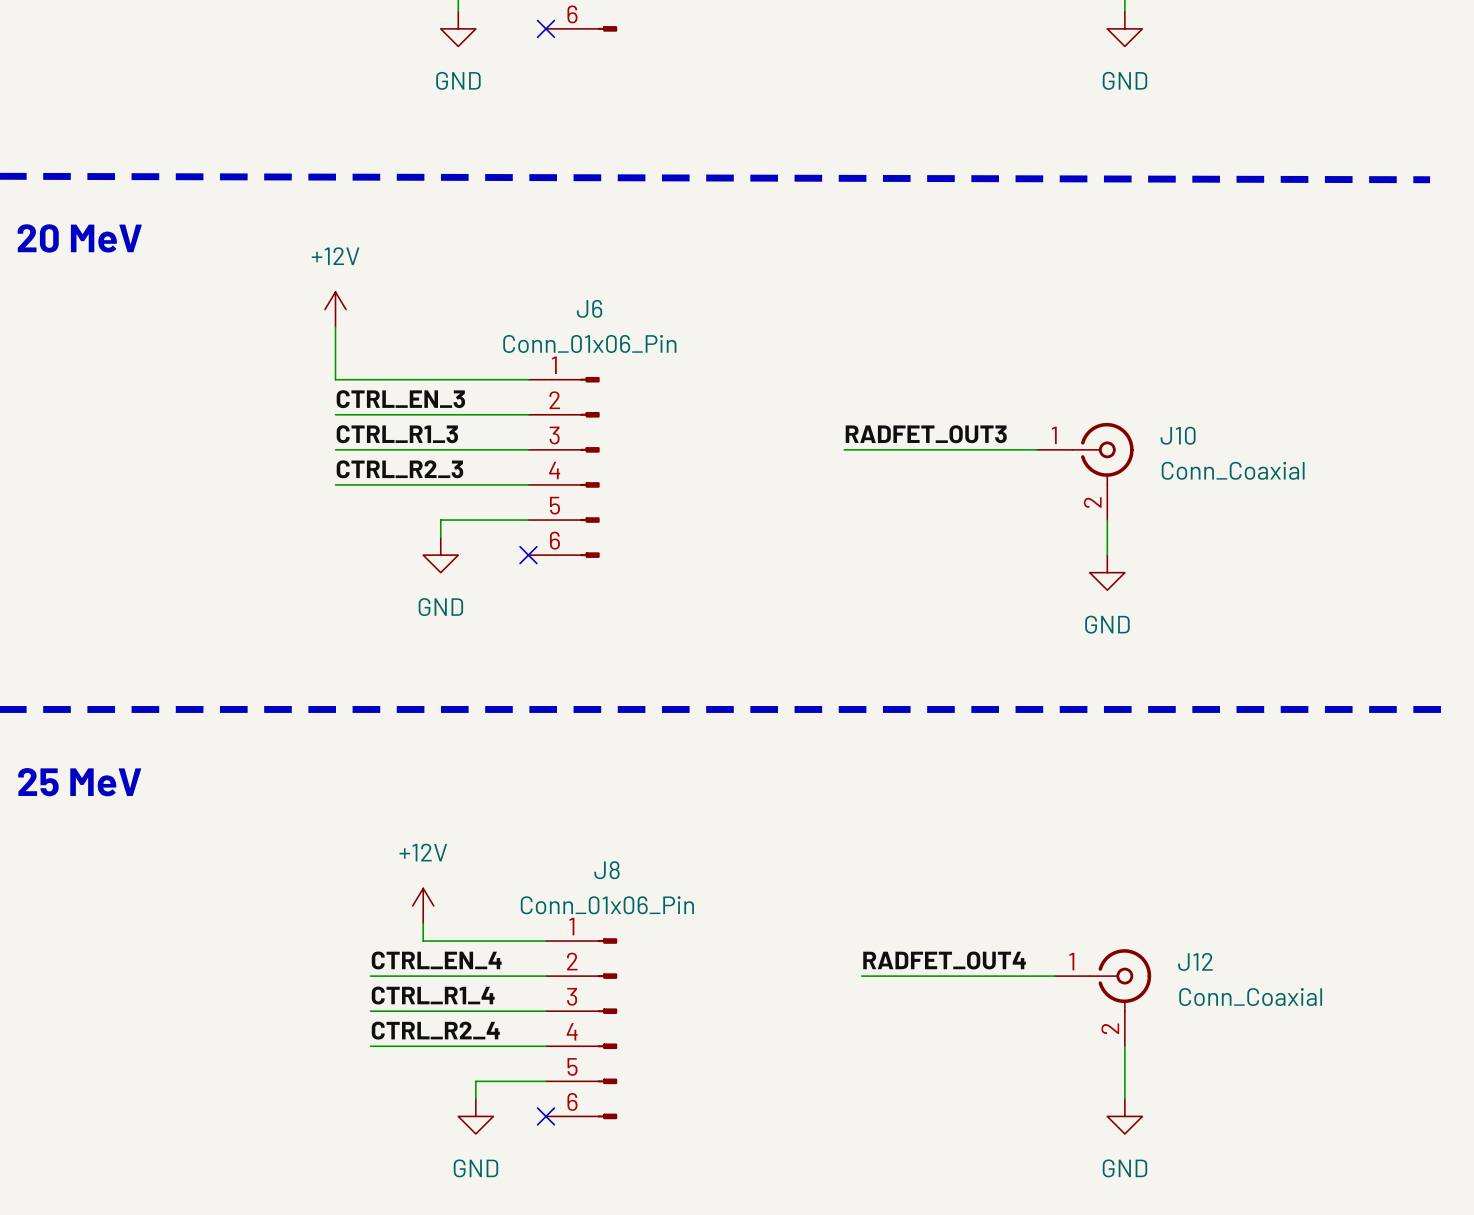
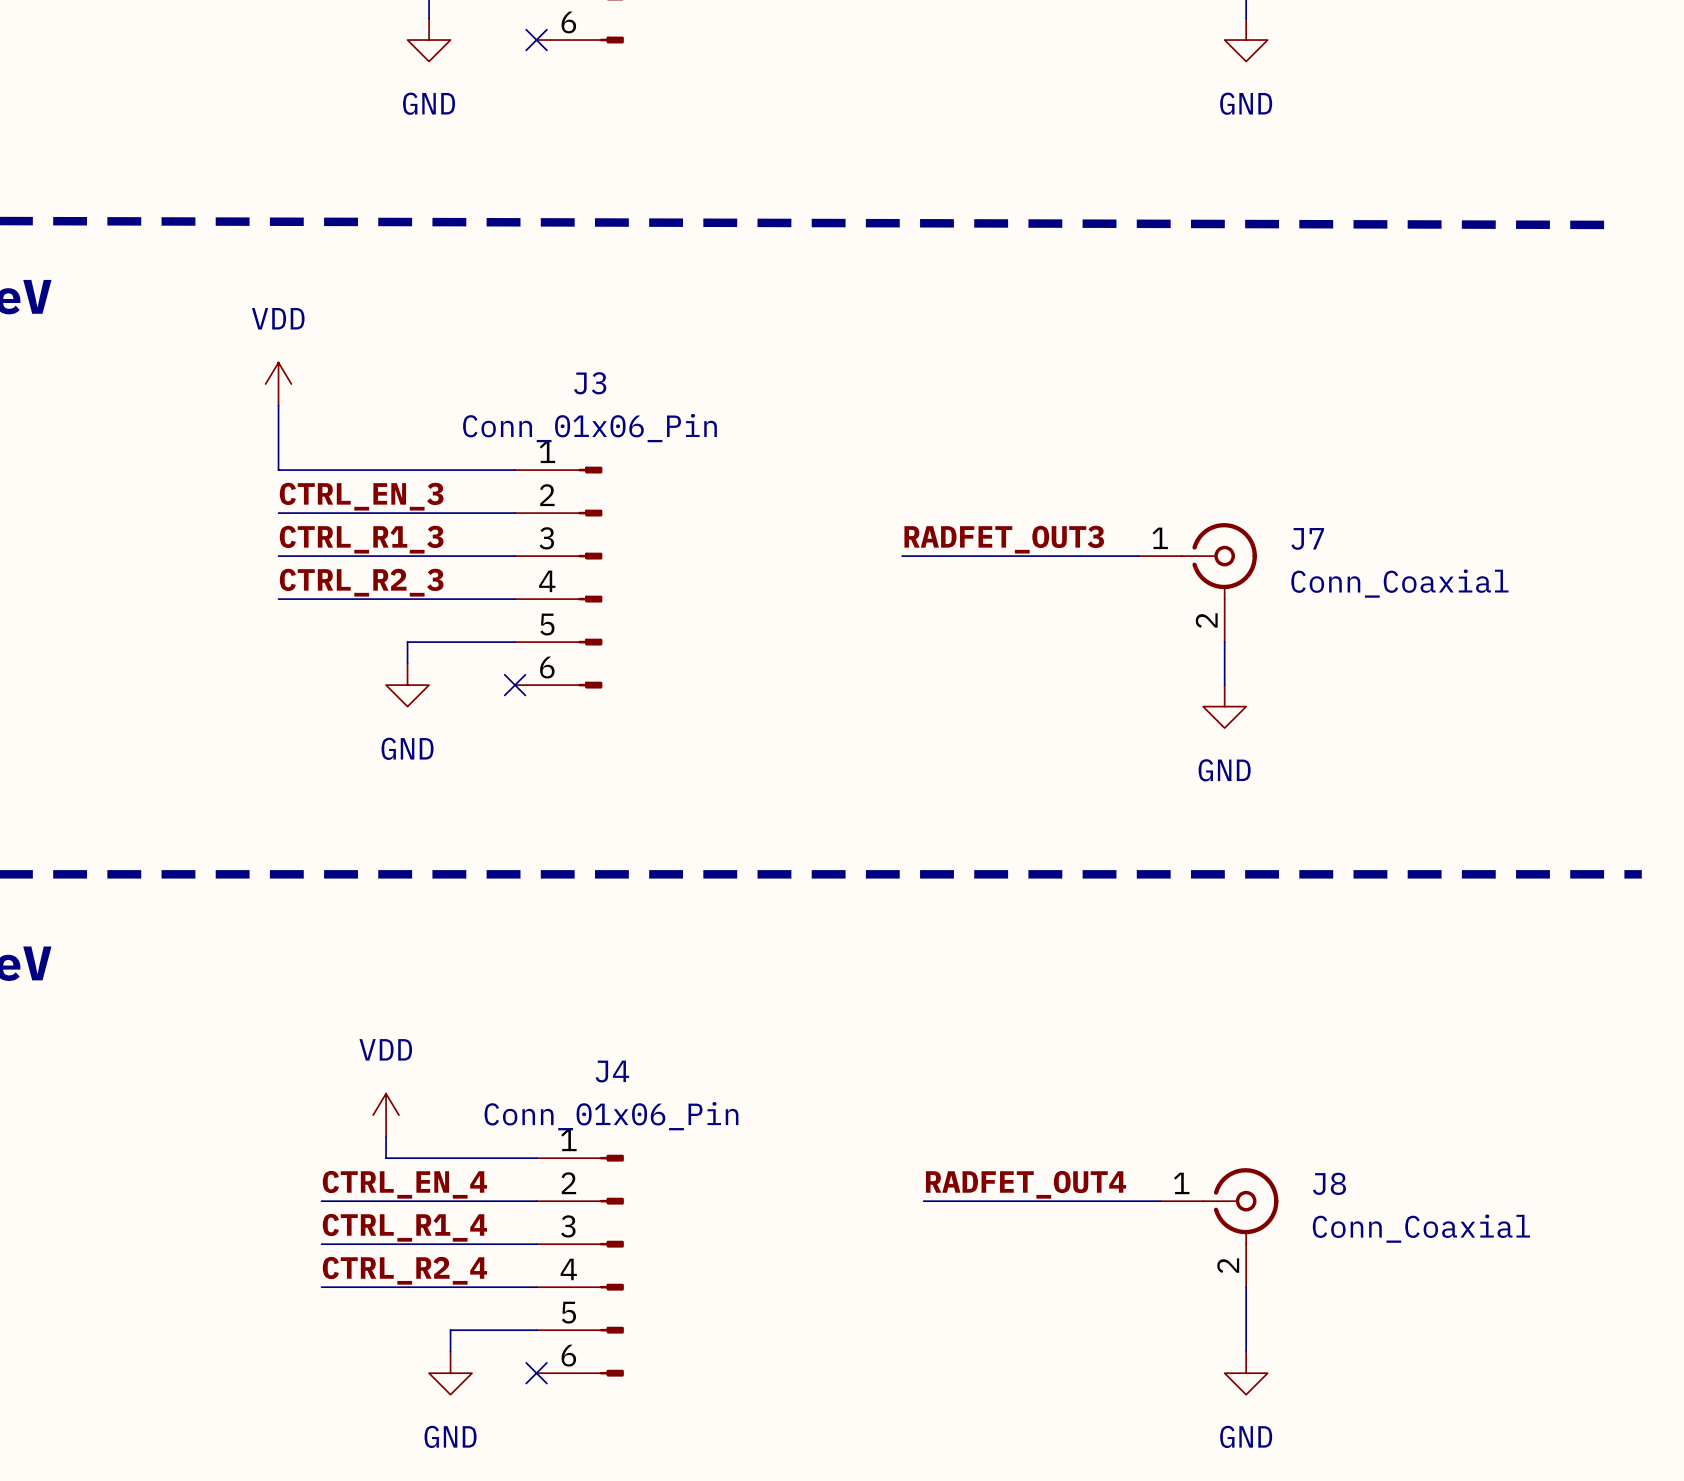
J6 name: J6 (589, 308) -> J3 (590, 383)
power symbol: +12V (335, 309) -> VDD (278, 384)
J10 name: J10 (1178, 435) -> J7 (1307, 538)
J8 name: J8 (606, 870) -> J4 (612, 1071)
power symbol: +12V (423, 905) -> VDD (386, 1115)
J12 name: J12 (1195, 961) -> J8 (1329, 1183)

